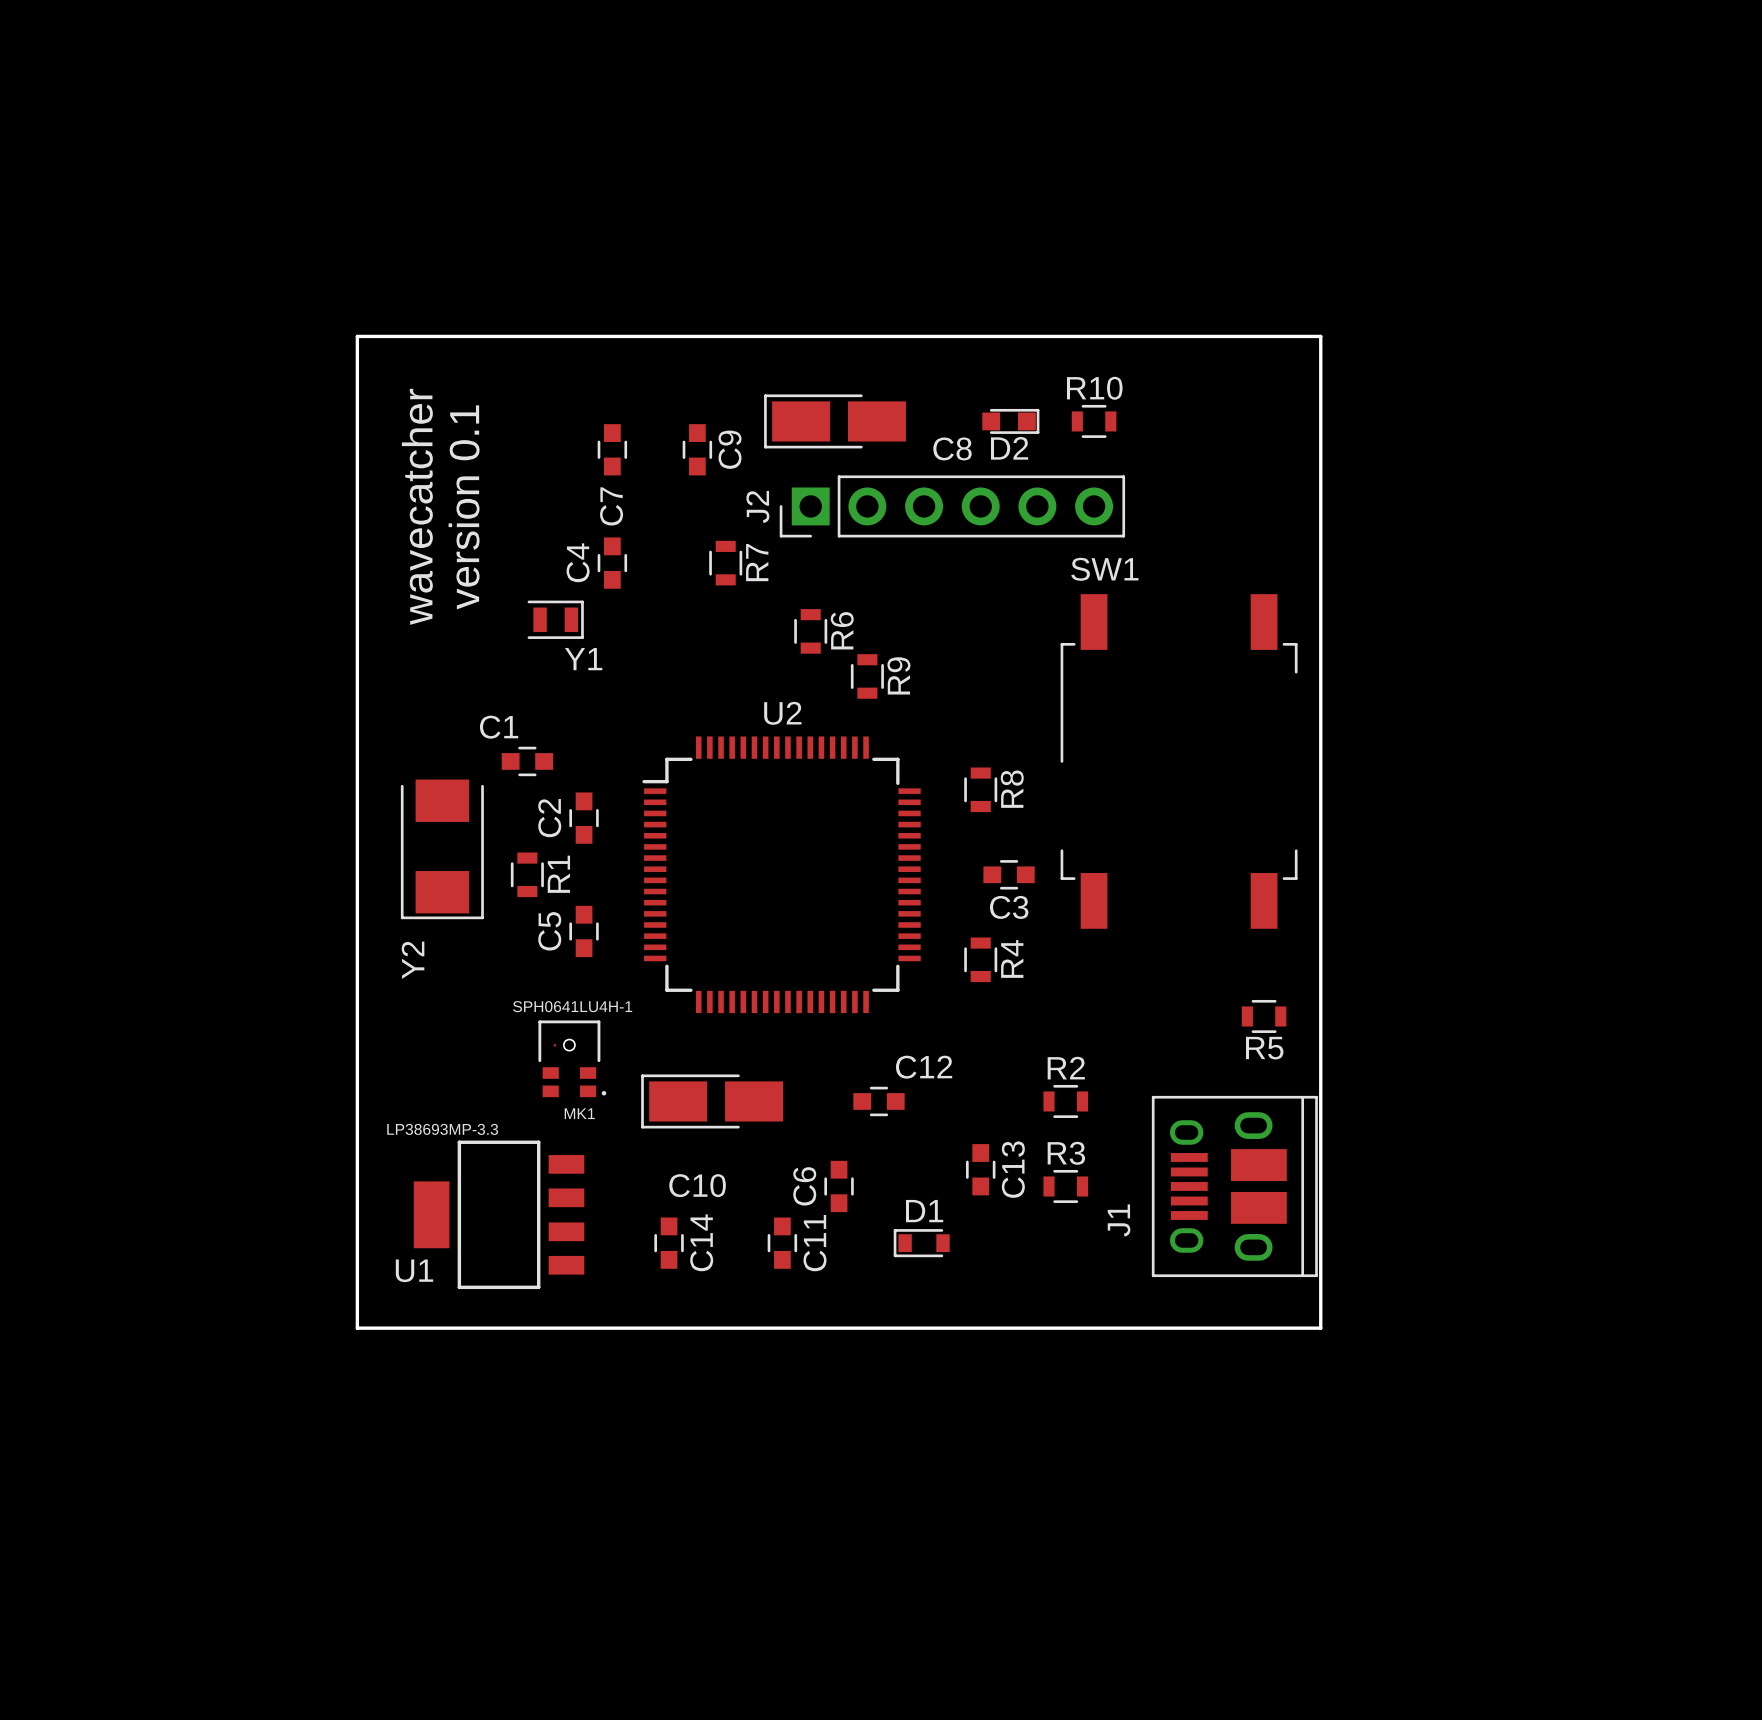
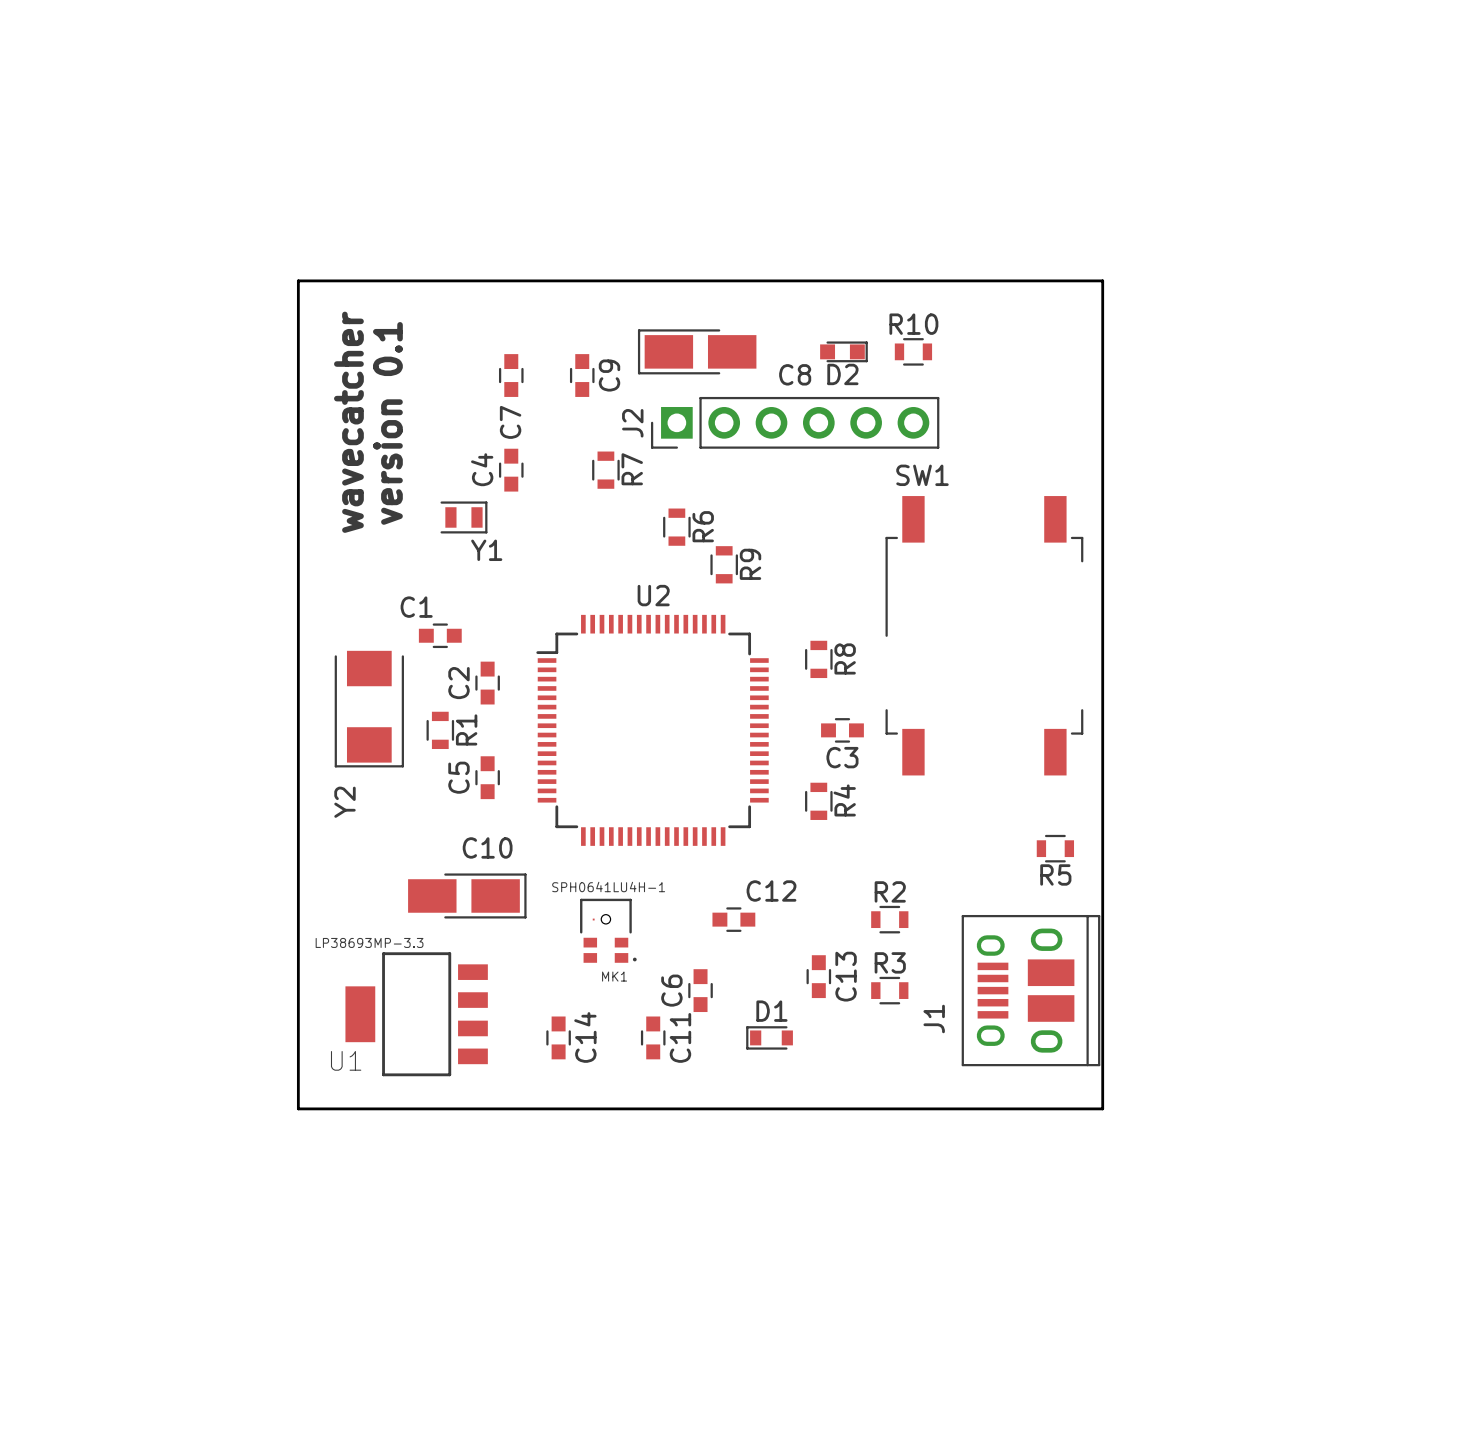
MK1 position: (572, 1058) -> (608, 930)
C10 rotation: 0° (712, 1101) -> 180° (467, 895)
C10 position: (712, 1101) -> (467, 895)

